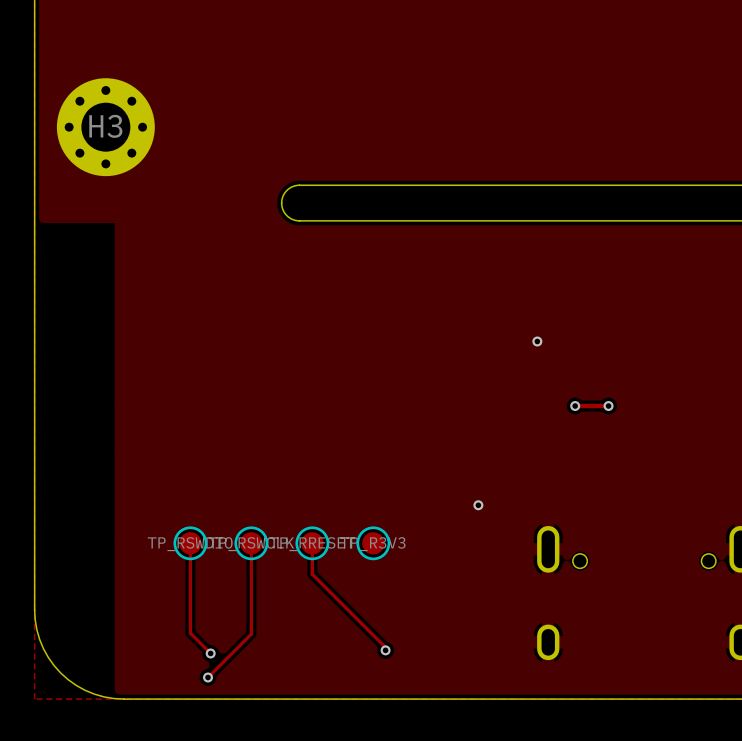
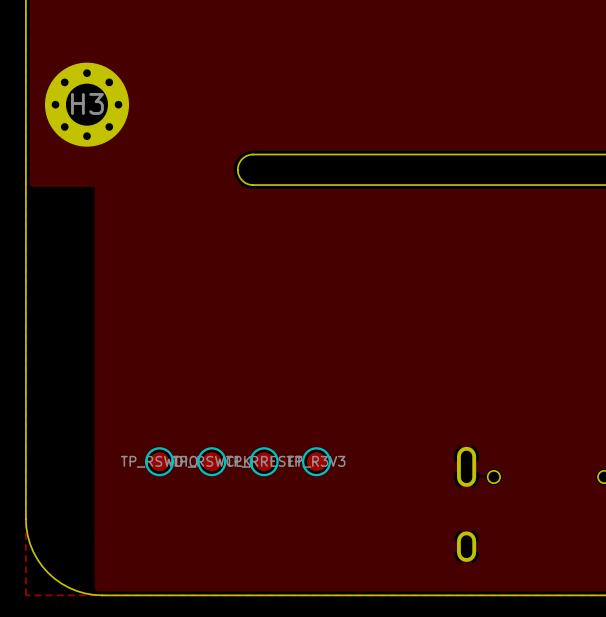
via: (537, 341) -> none
track: (575, 406) (608, 406) -> none
via: (575, 406) -> none
via: (608, 406) -> none
via: (478, 505) -> none
track: (190, 543) (190, 633) (210, 653) -> none
track: (251, 543) (251, 634) (208, 677) -> none
track: (312, 543) (312, 574) (385, 647) (385, 650) -> none
via: (385, 650) -> none
via: (210, 653) -> none
via: (208, 677) -> none

